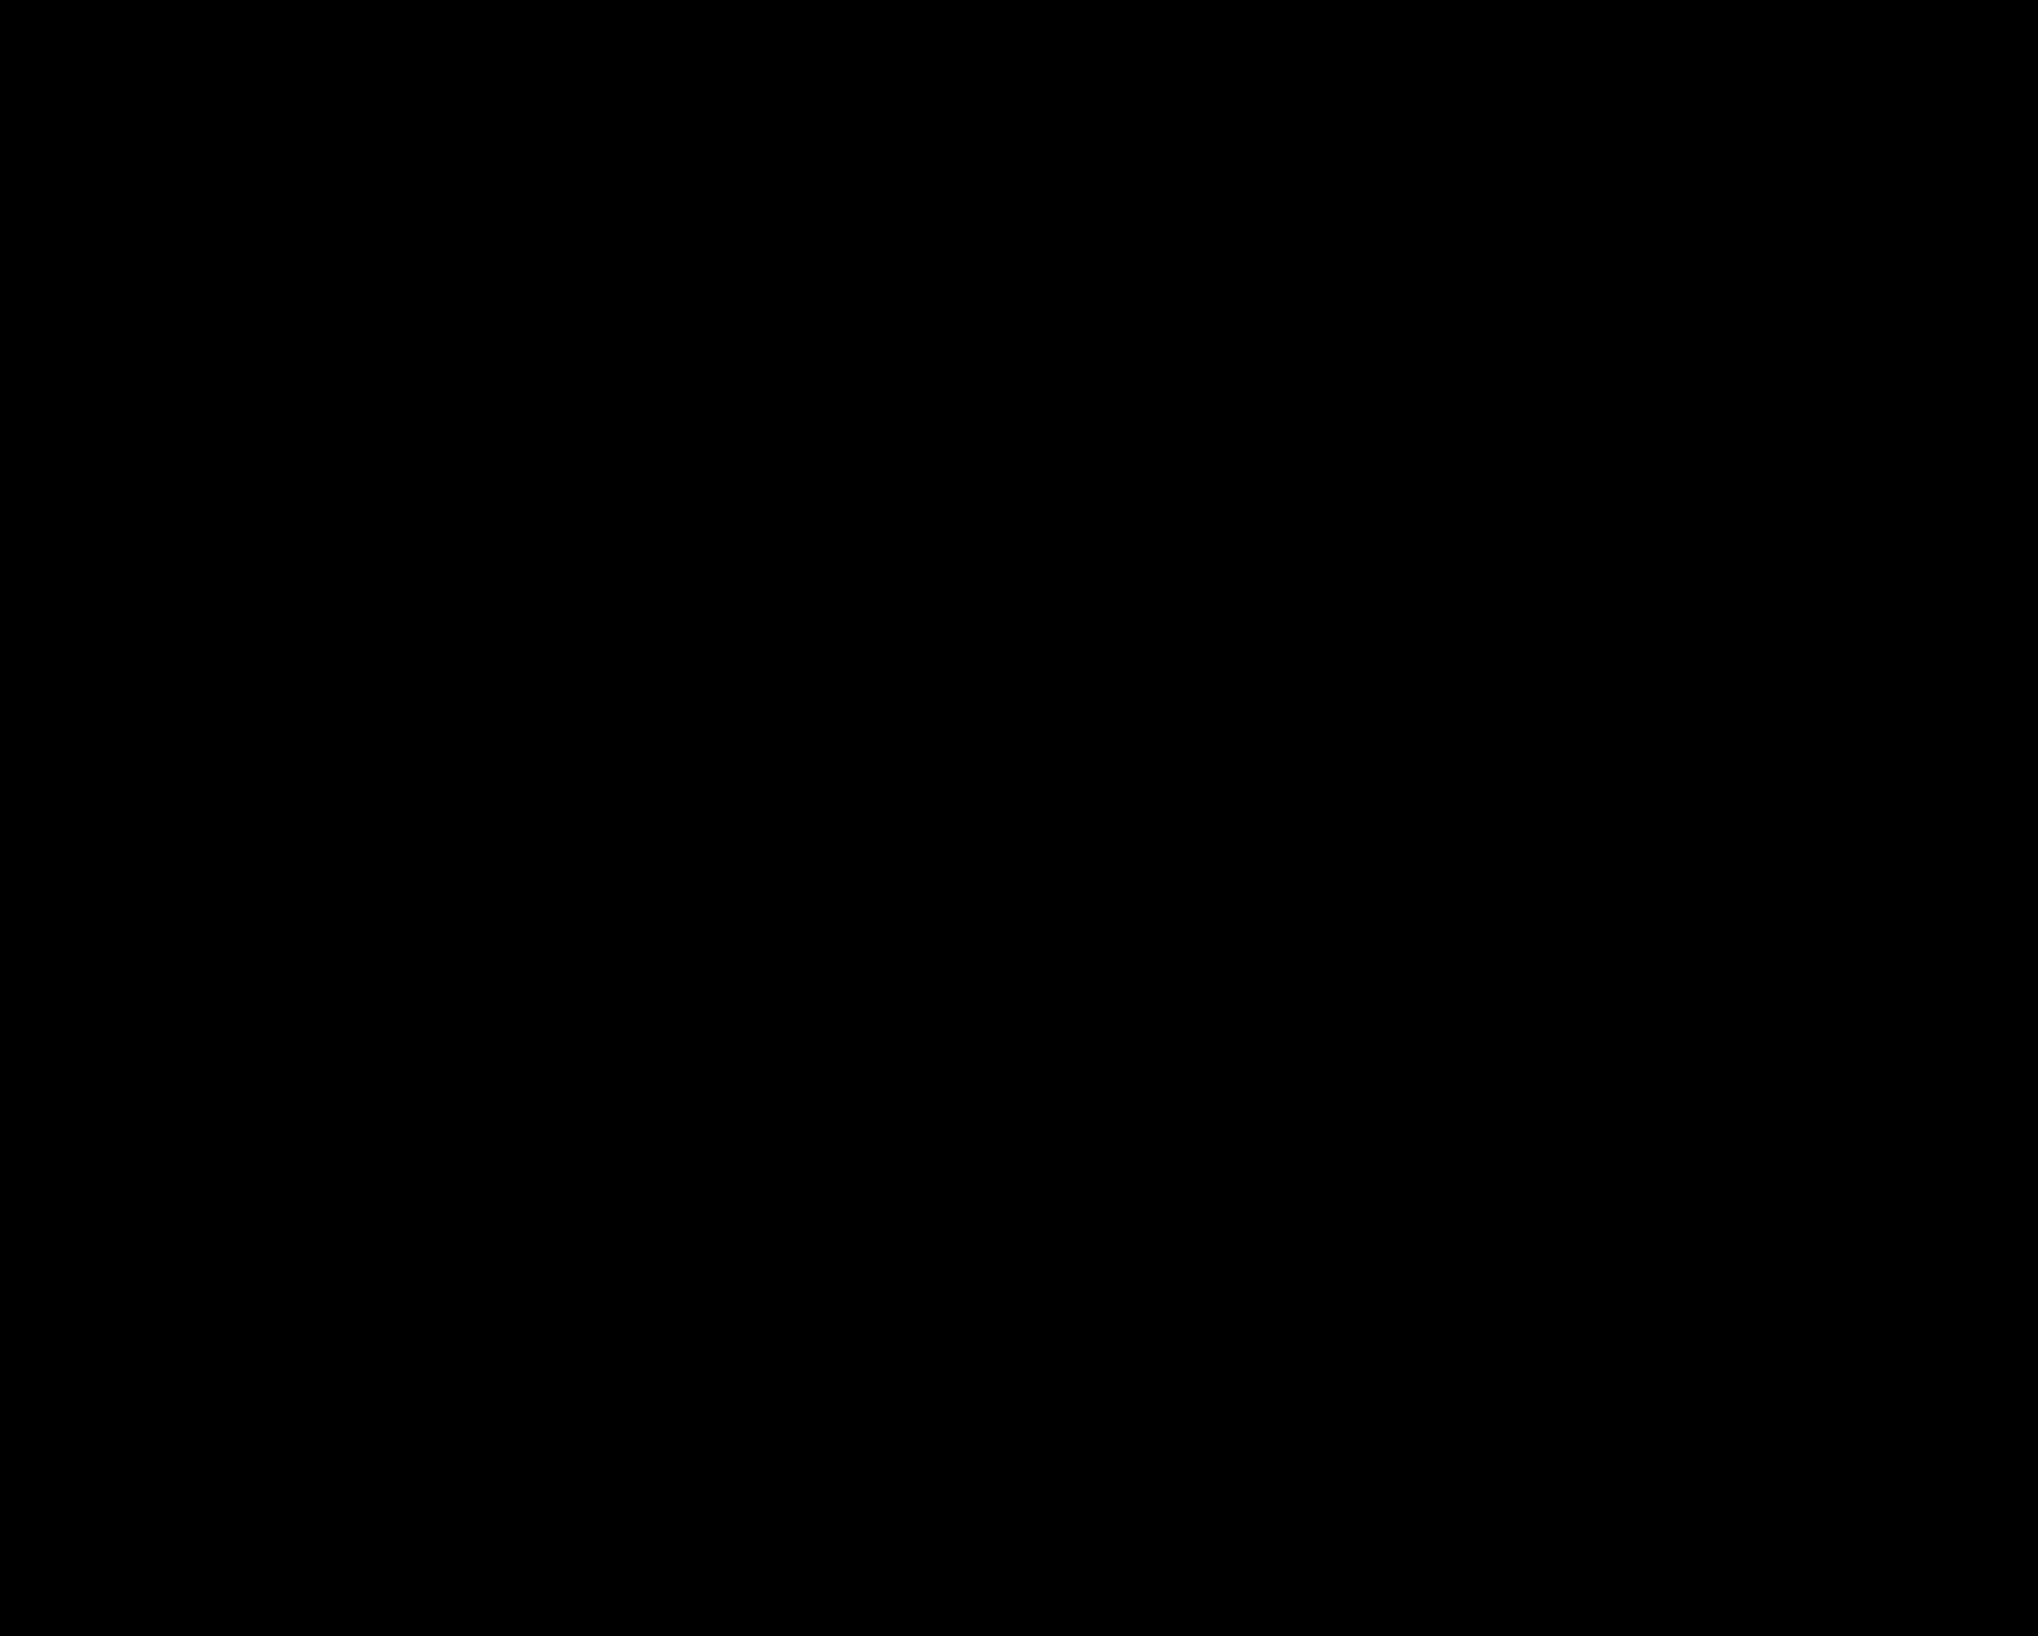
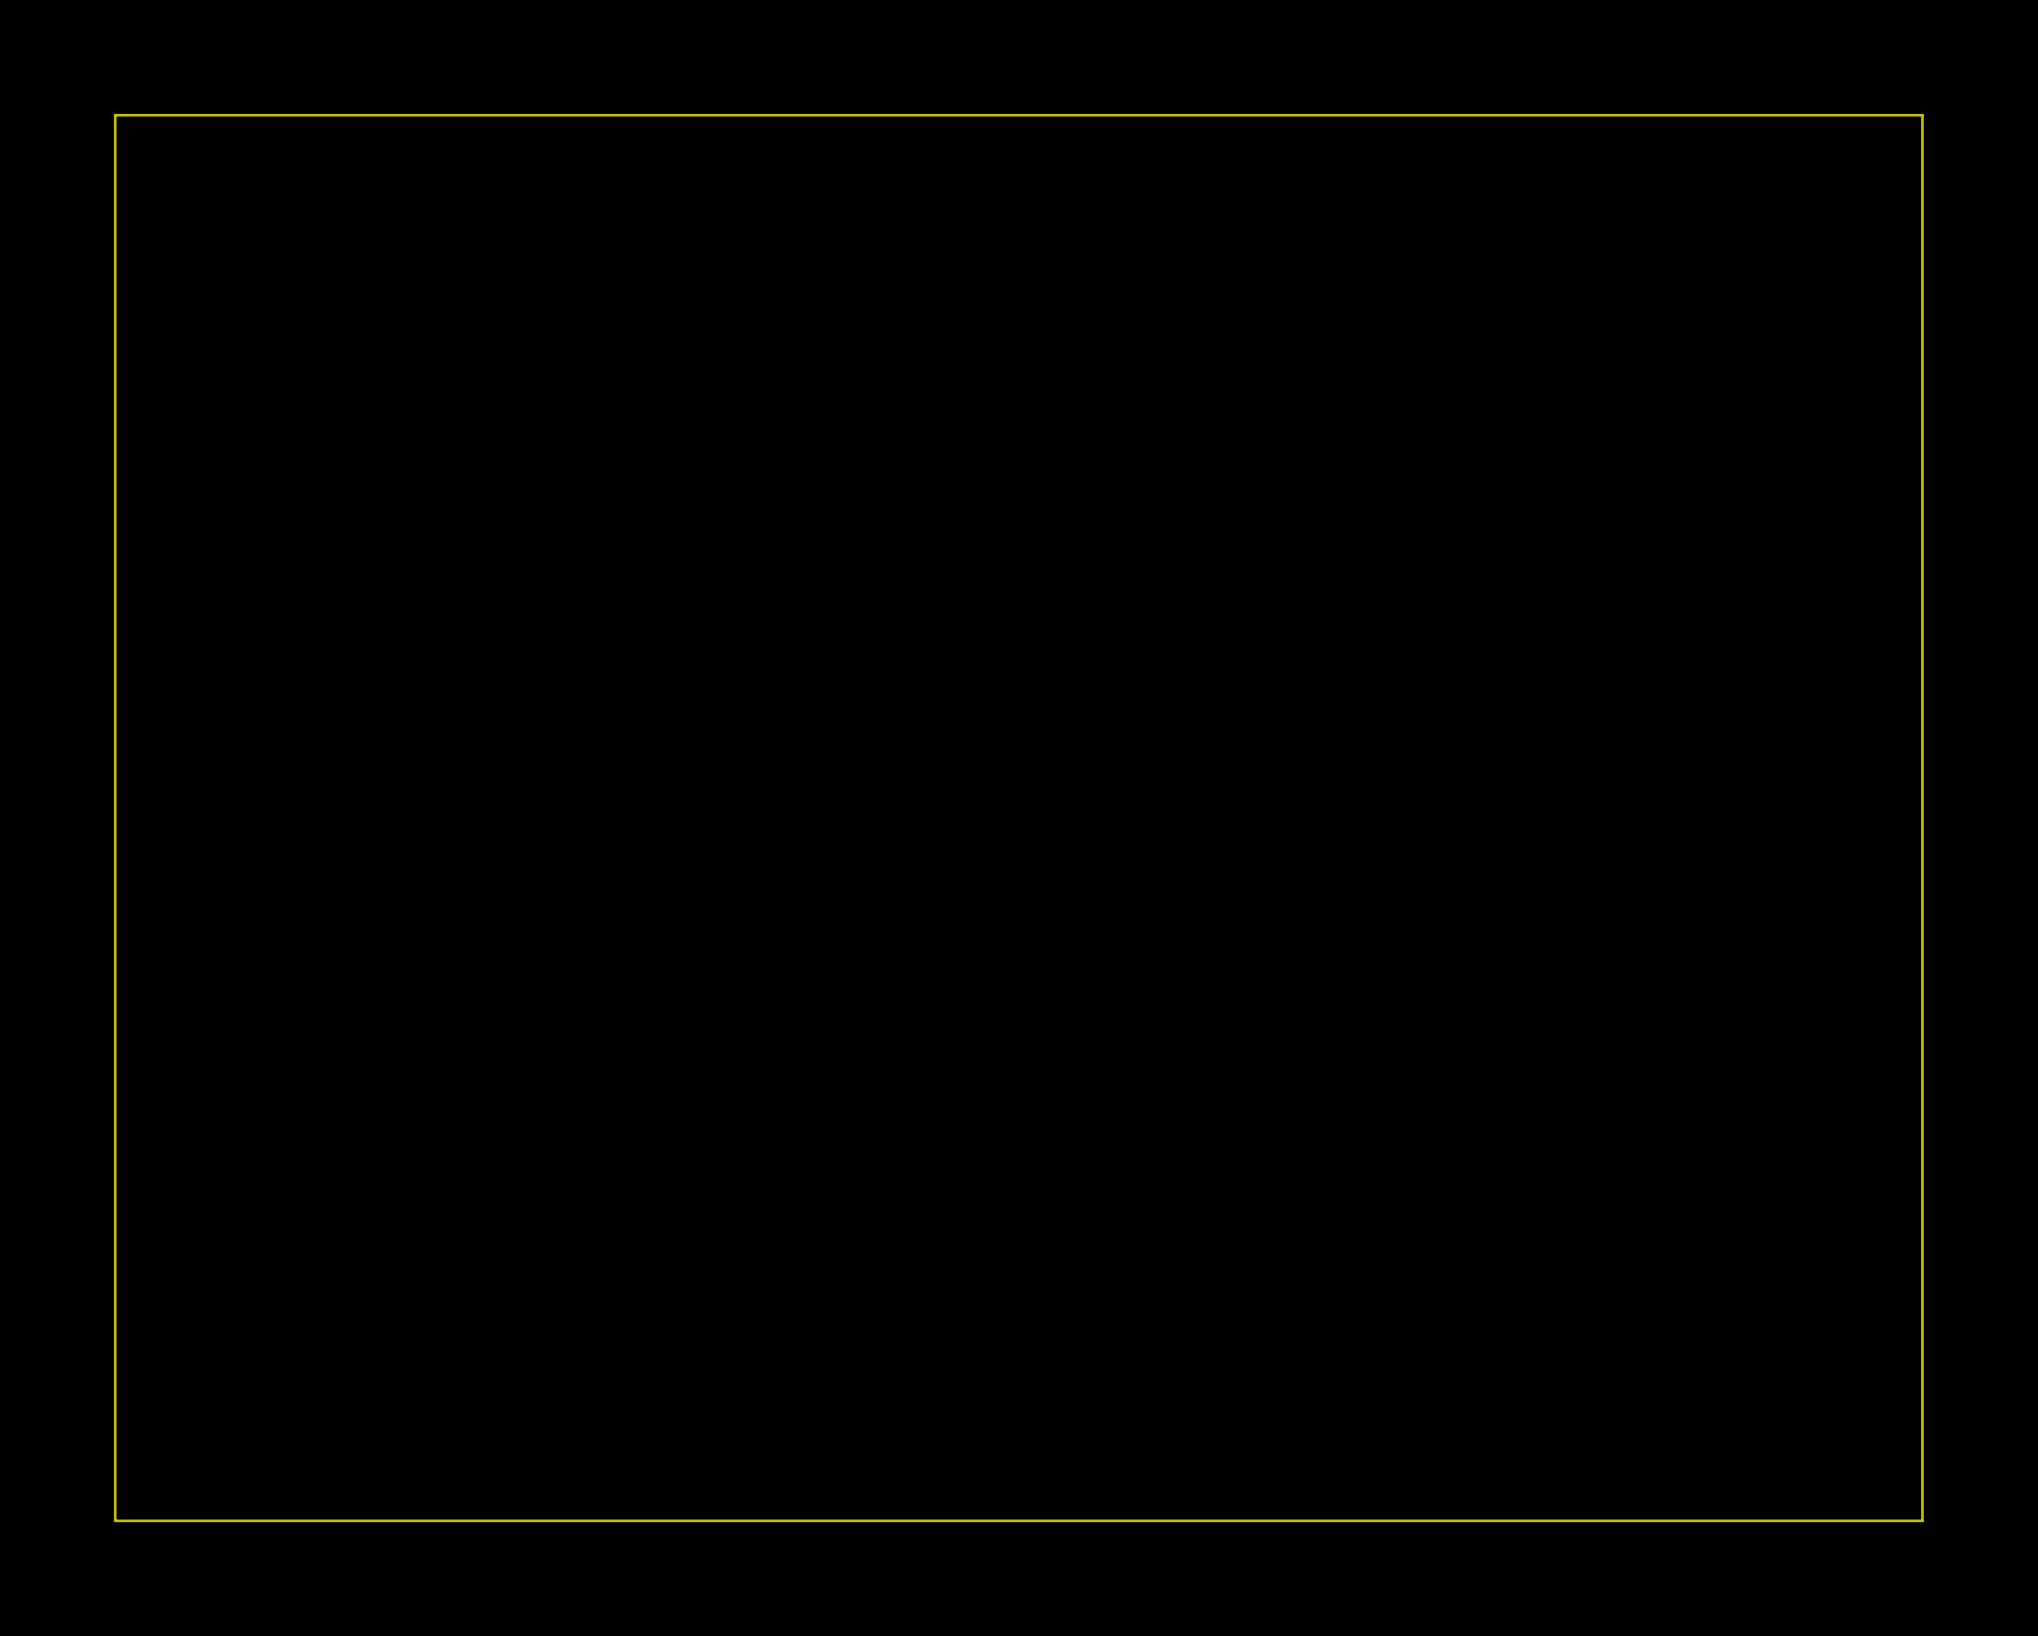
board edge: none -> (115, 115) (115, 1520) (1922, 1520) (1922, 115) (115, 115)

